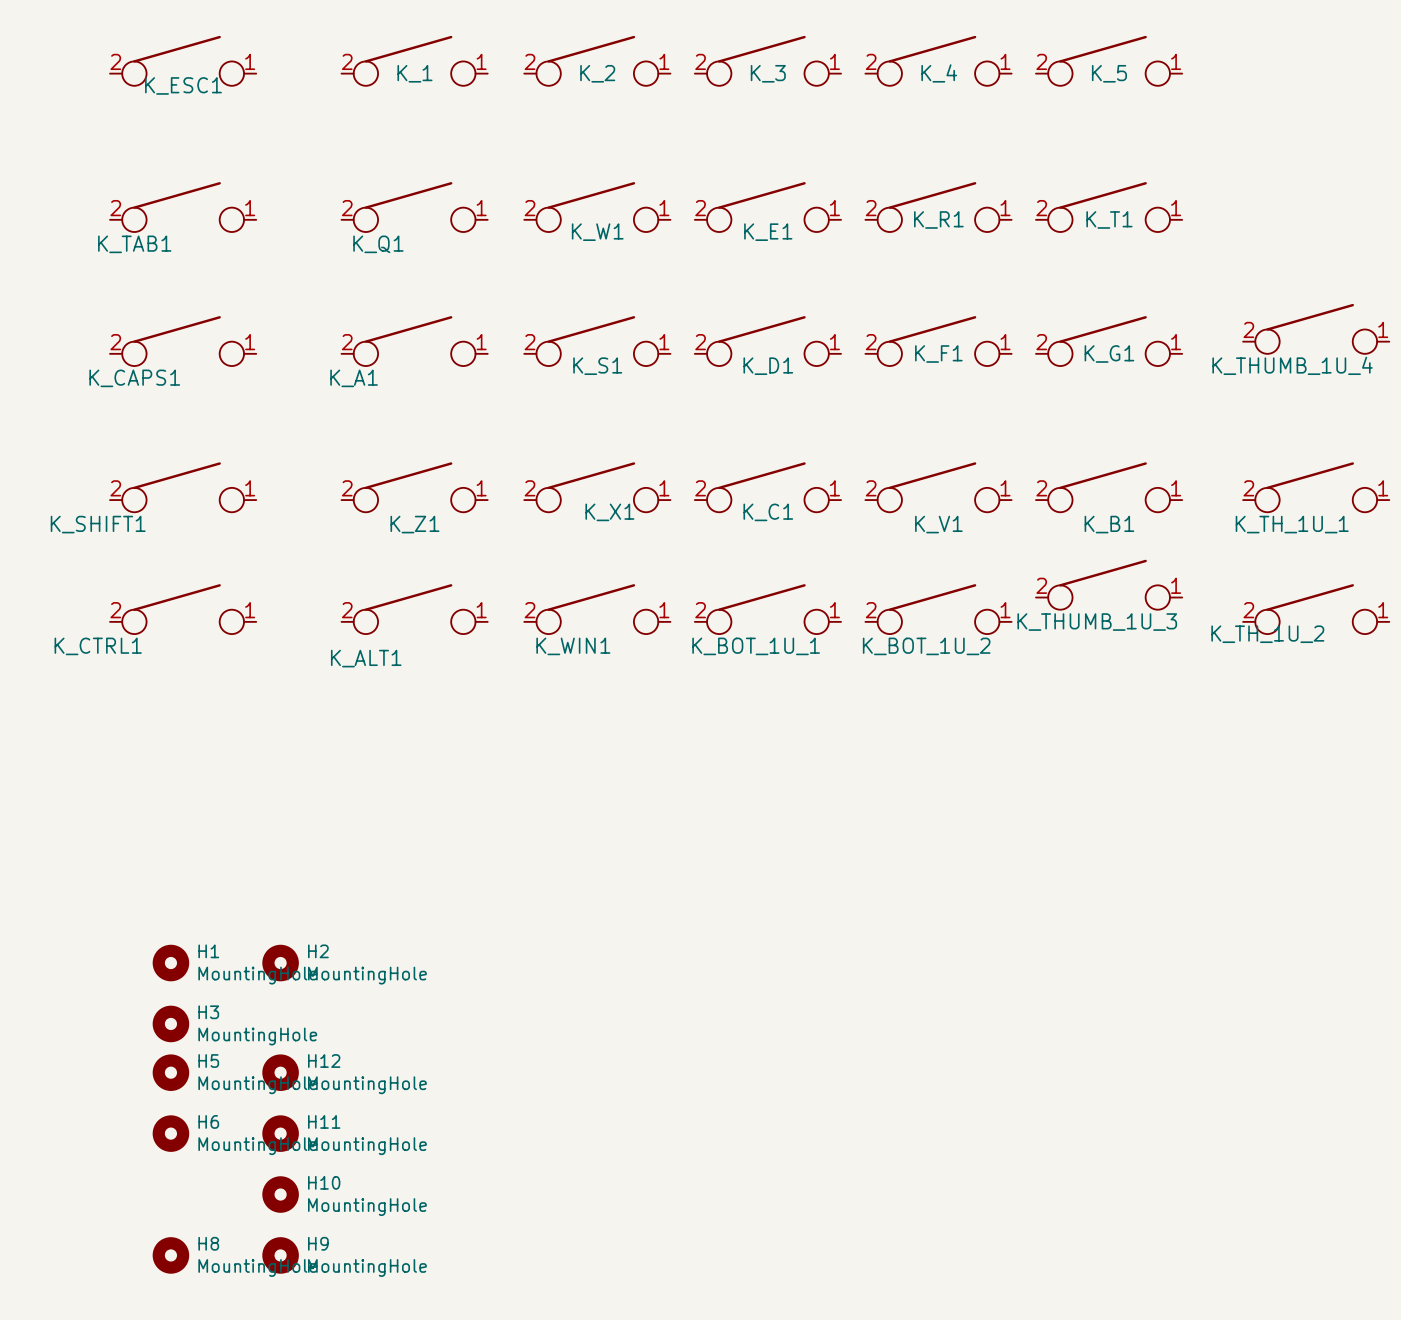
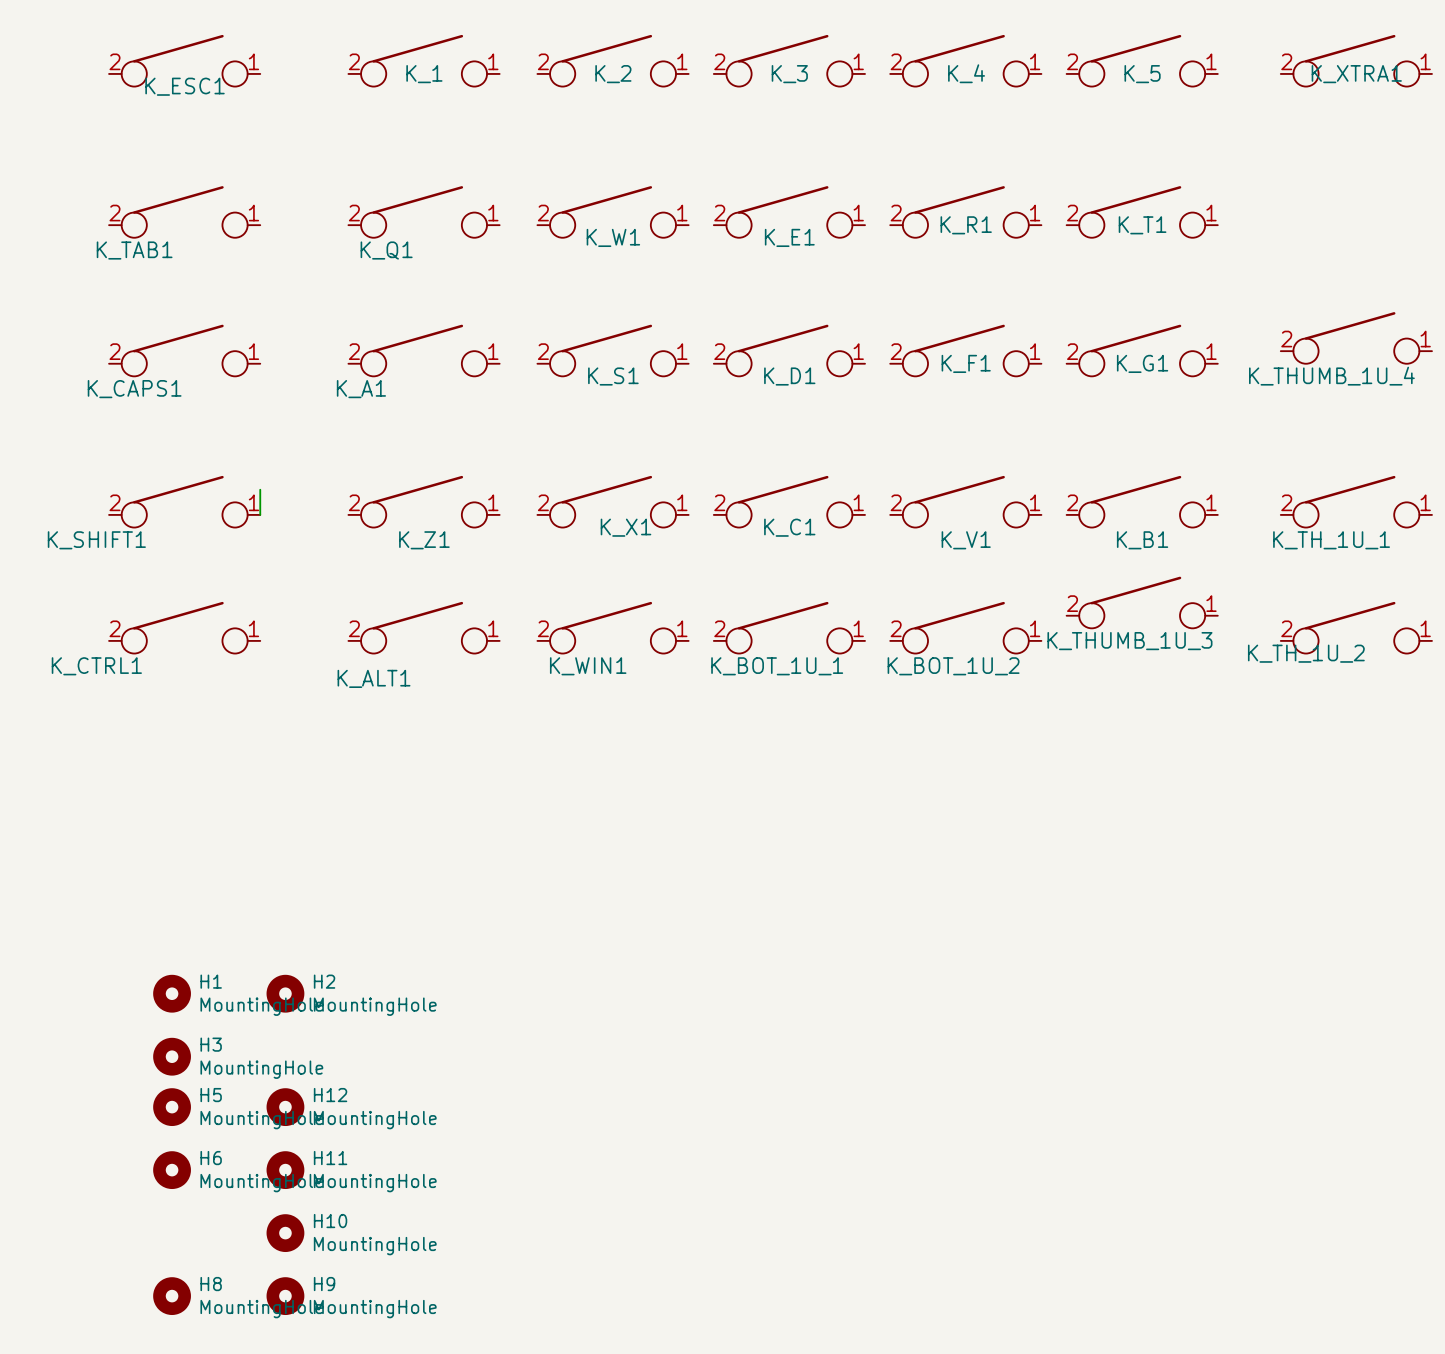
K_XTRA1: none -> (1356, 60)
wire: none -> (260, 489) (260, 514)

